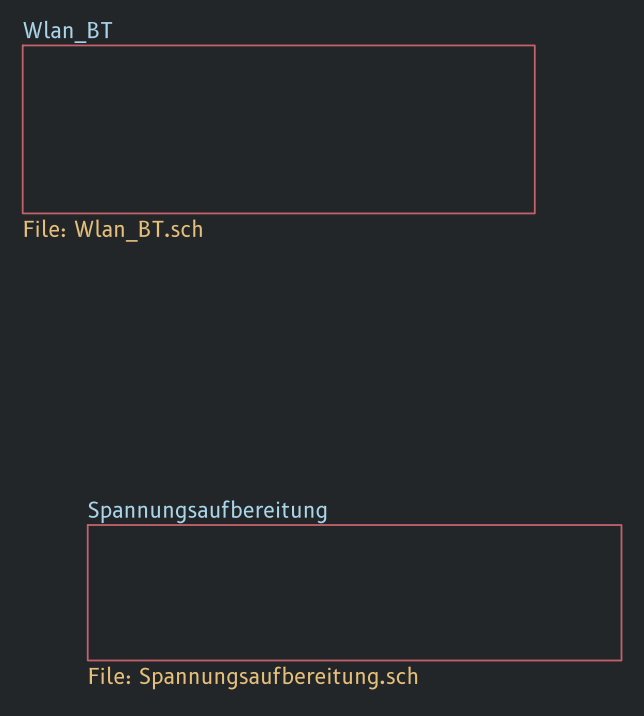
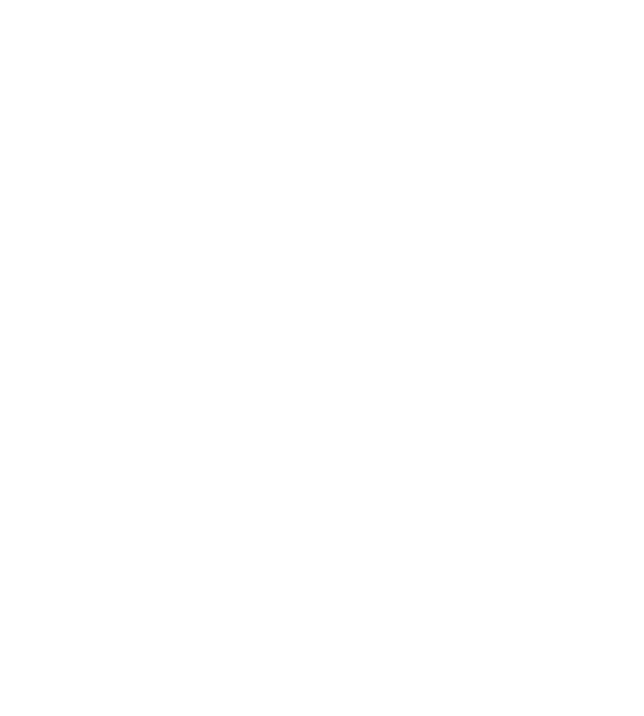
sheet Wlan_BT: File: Wlan_BT.sch (278, 129) -> none
sheet Spannungsaufbereitung: File: Spannungsaufbereitung.sch (354, 592) -> none

